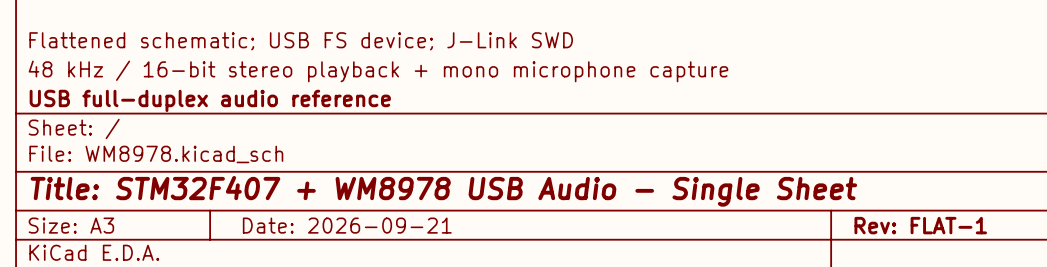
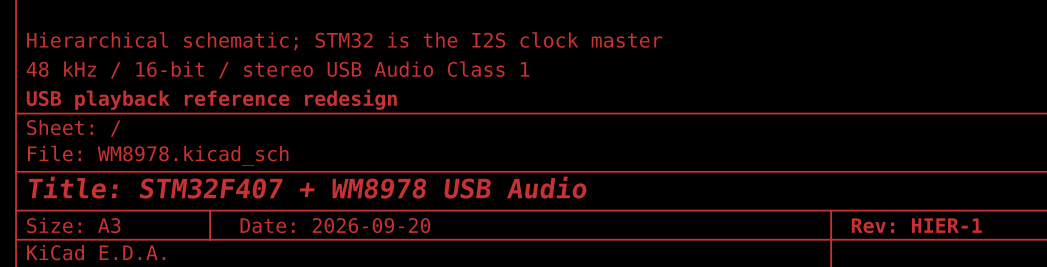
title block: Flattened schematic; USB FS device; J-Link SWD (301, 41) -> Hierarchical schematic; STM32 is the I2S clock master (344, 41)
title block: 48 kHz / 16-bit stereo playback + mono microphone capture (378, 71) -> 48 kHz / 16-bit / stereo USB Audio Class 1 (277, 69)
title block: USB full-duplex audio reference (210, 100) -> USB playback reference redesign (211, 99)
title block: Title: STM32F407 + WM8978 USB Audio - Single Sheet (443, 191) -> Title: STM32F407 + WM8978 USB Audio (307, 187)
title block: Date: 2026-09-21 (347, 225) -> Date: 2026-09-20 (335, 225)
title block: Rev: FLAT-1 (920, 225) -> Rev: HIER-1 (916, 225)

